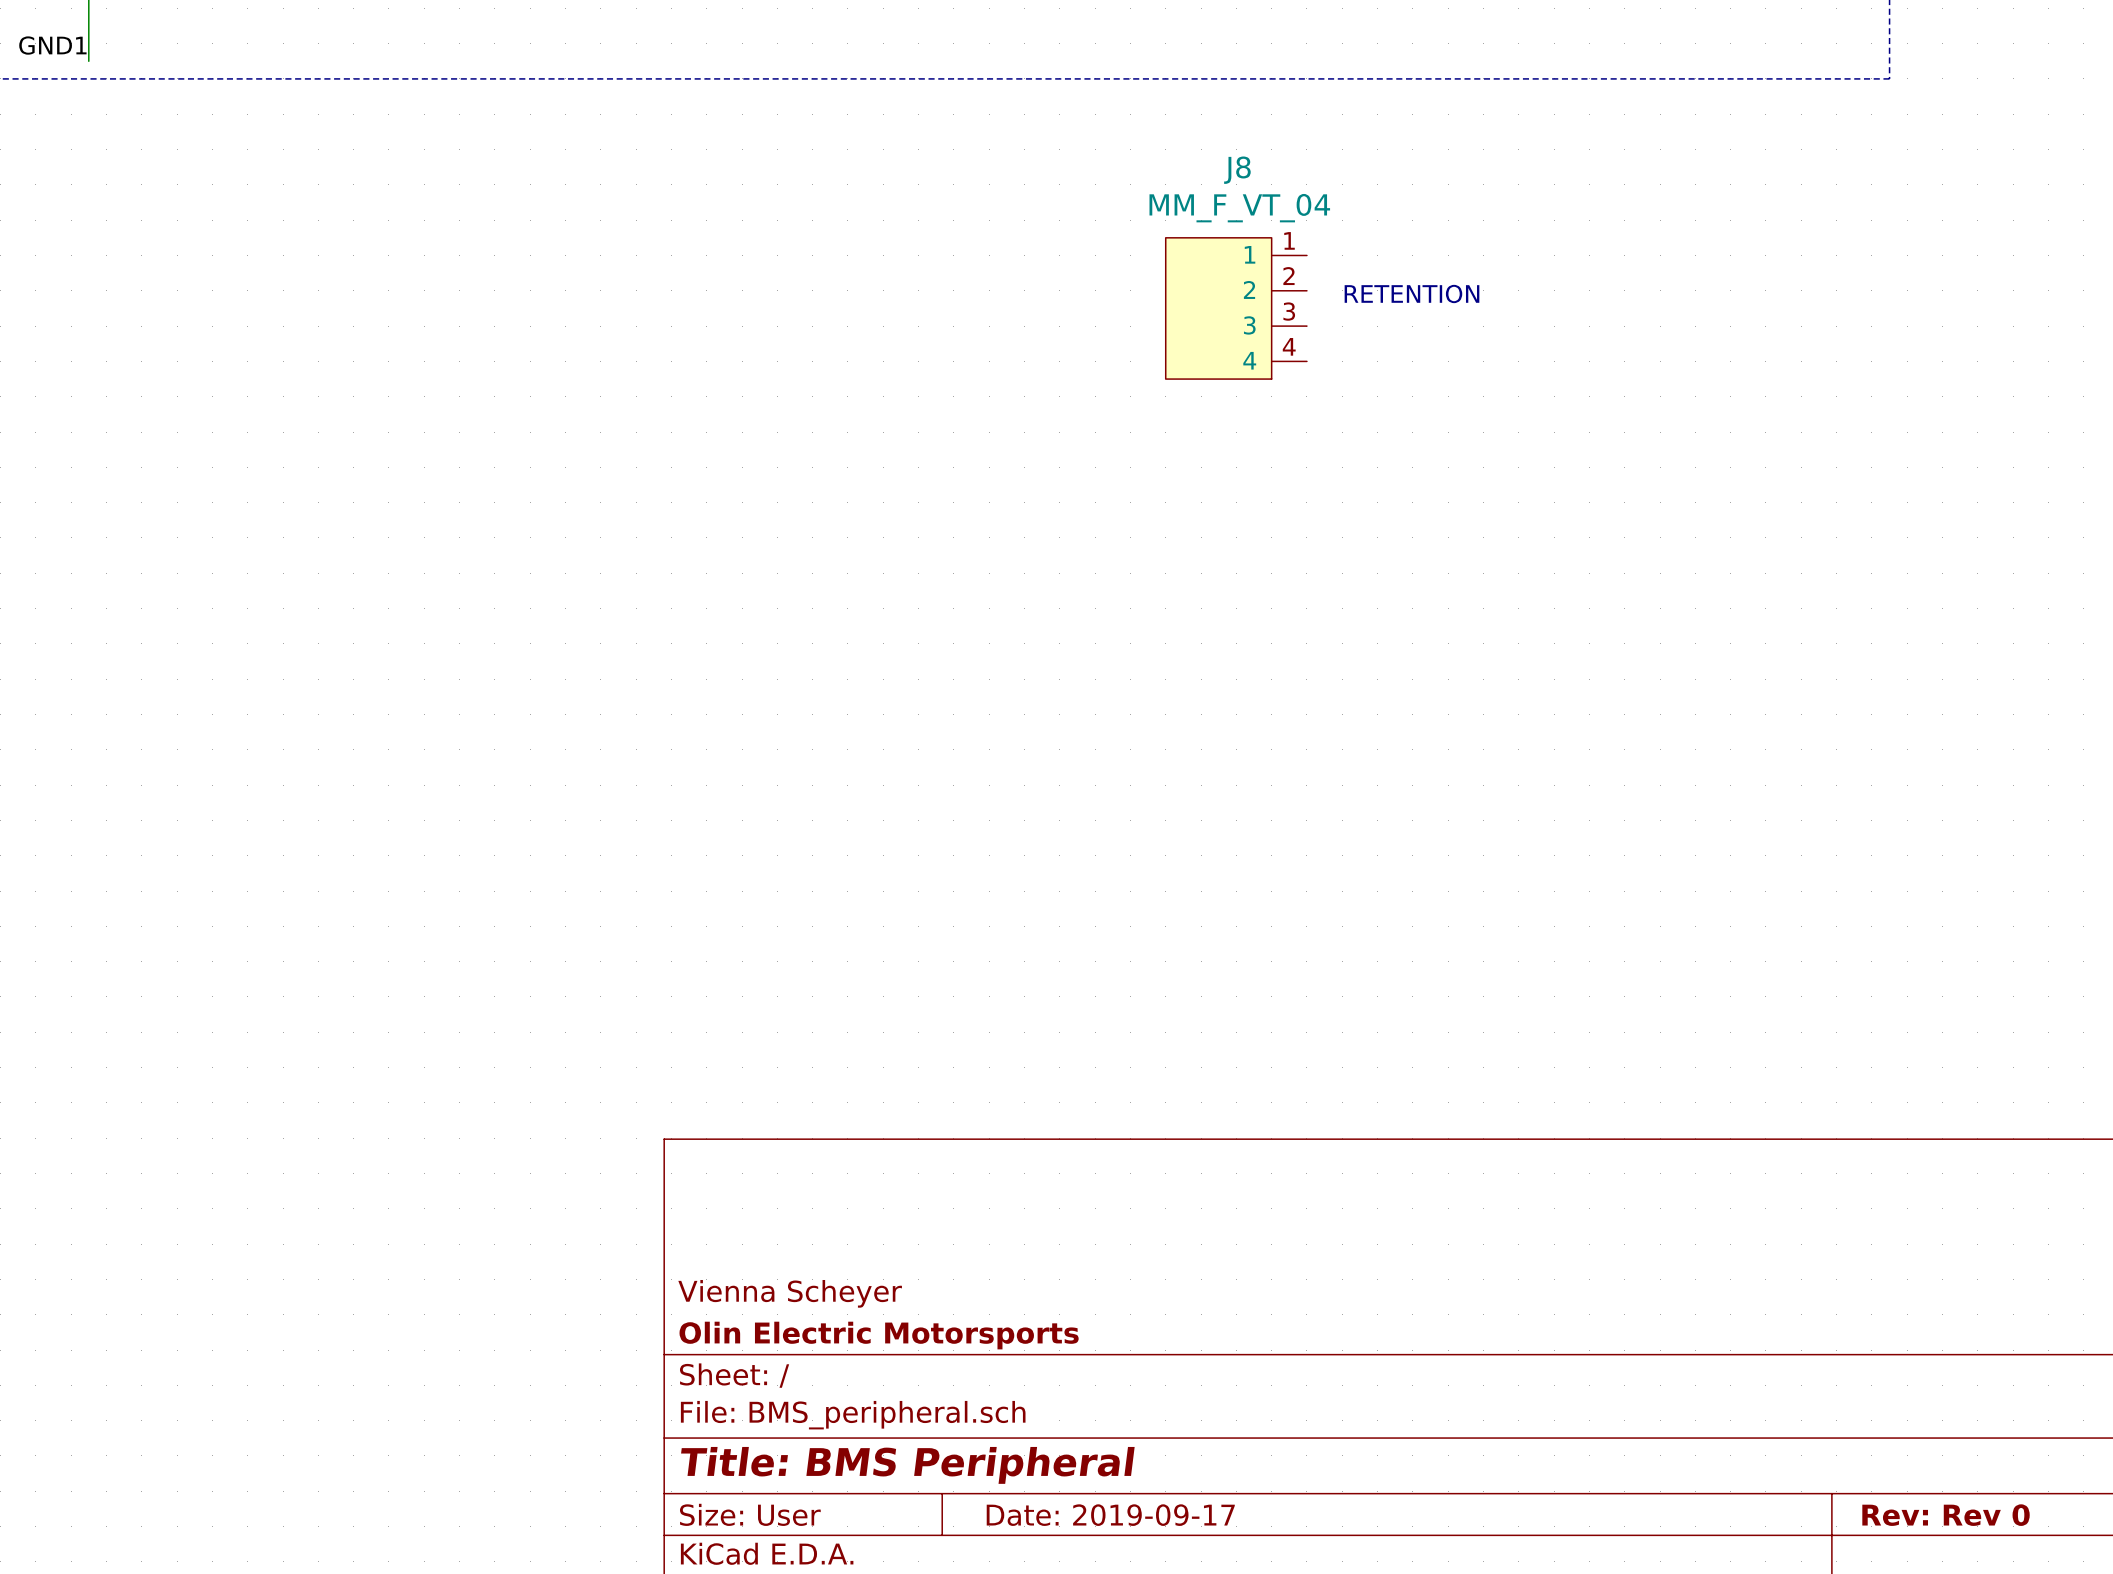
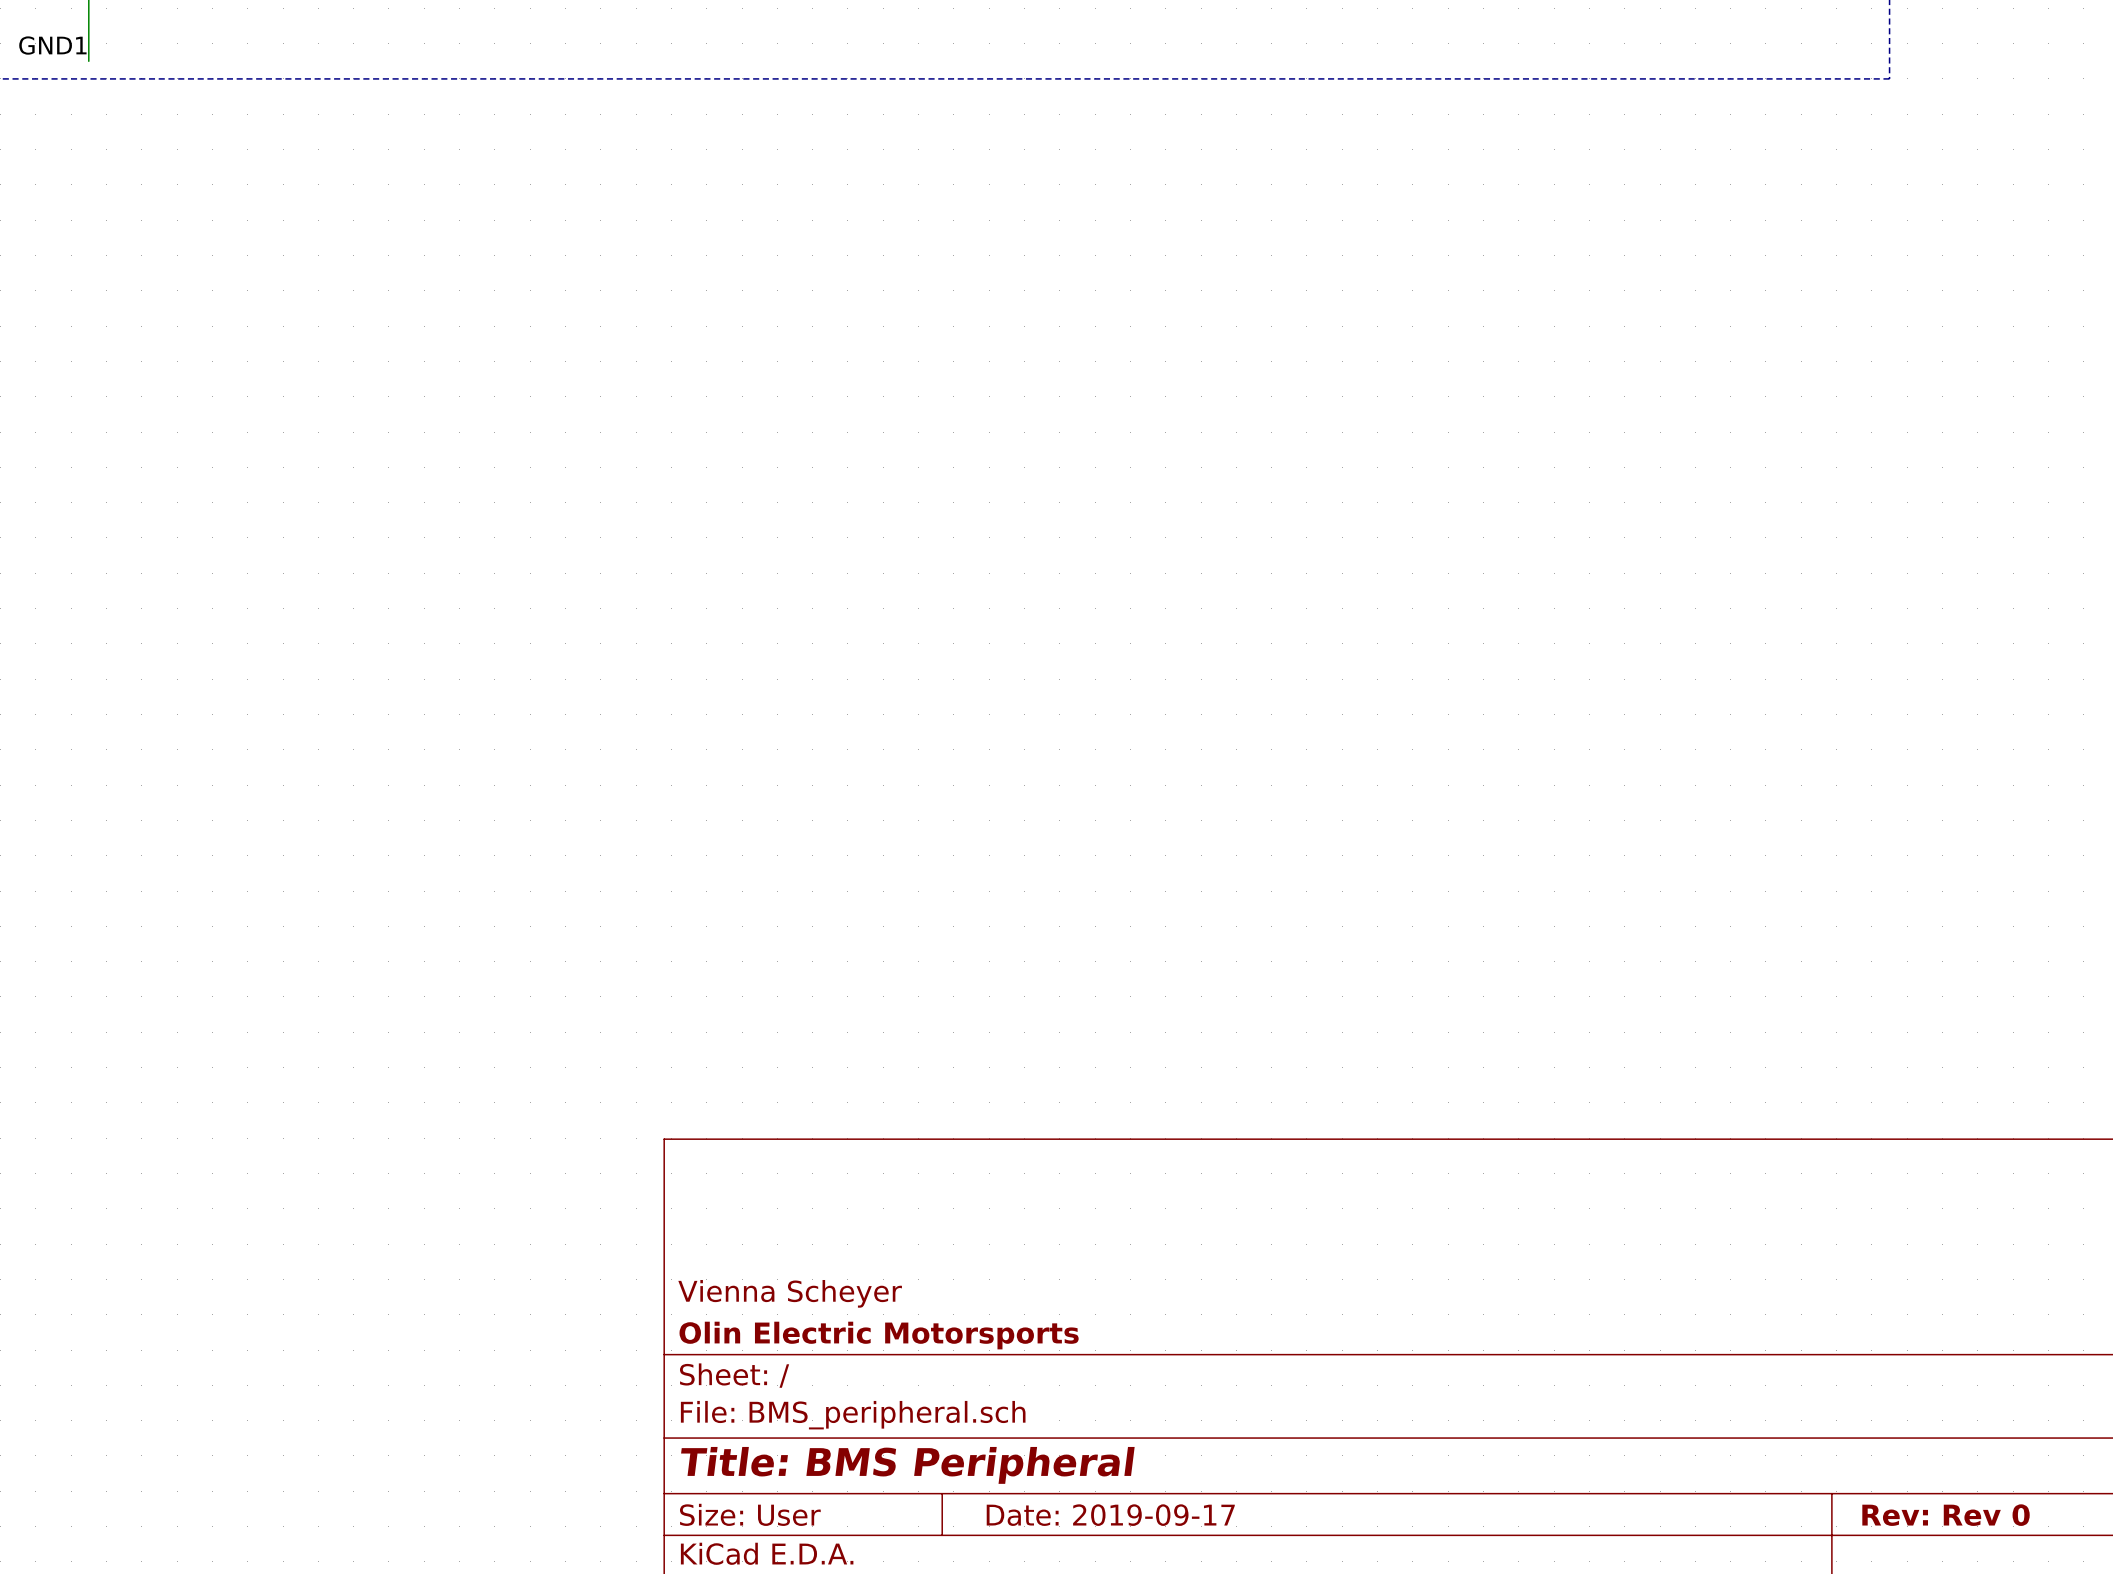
text: RETENTION (1411, 293) -> none
J8: MM_F_VT_04 (1236, 308) -> none

